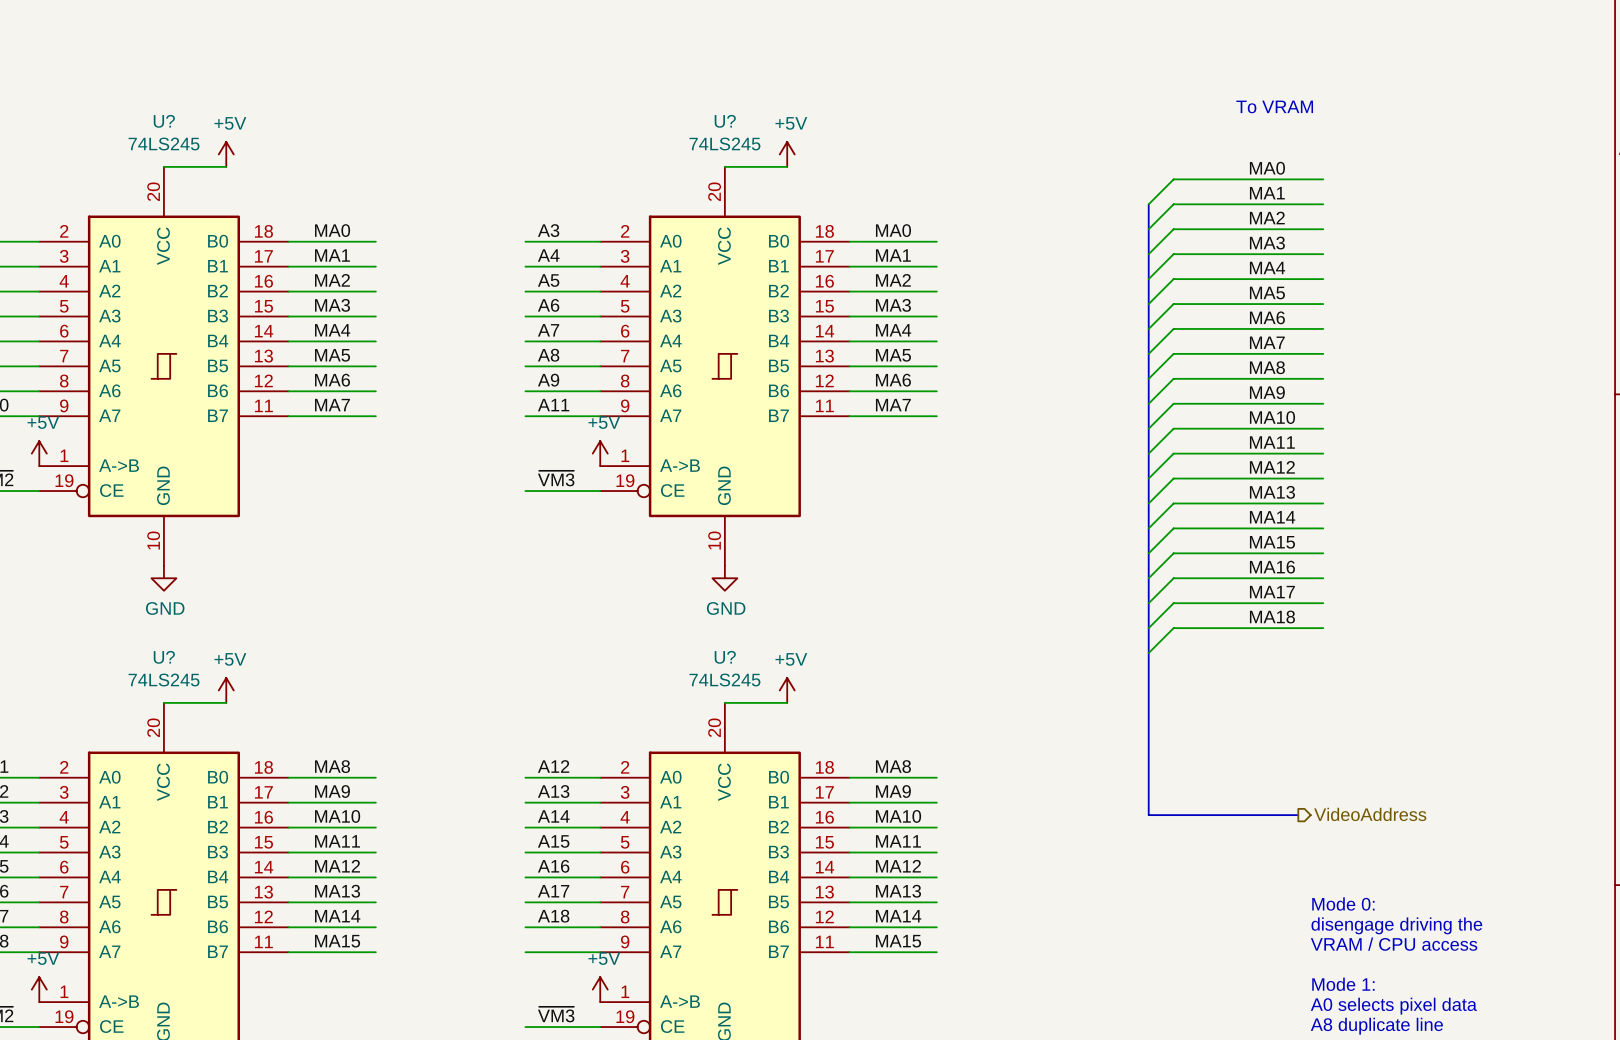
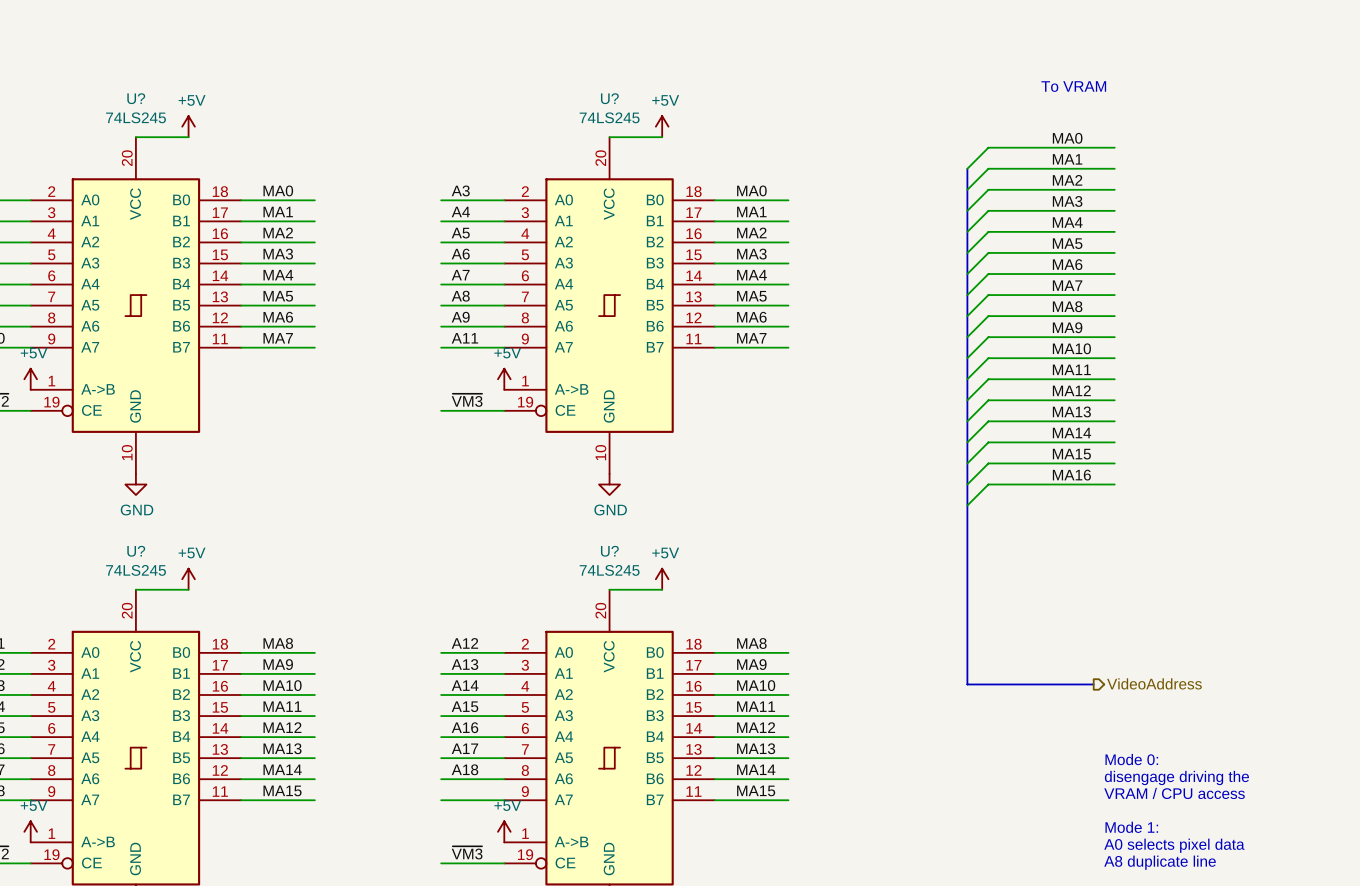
label: MA17 (1272, 592) -> none
wire: (1323, 603) (1173, 603) (1148, 628) -> none
label: MA18 (1272, 617) -> none
wire: (1323, 628) (1173, 628) (1148, 653) -> none

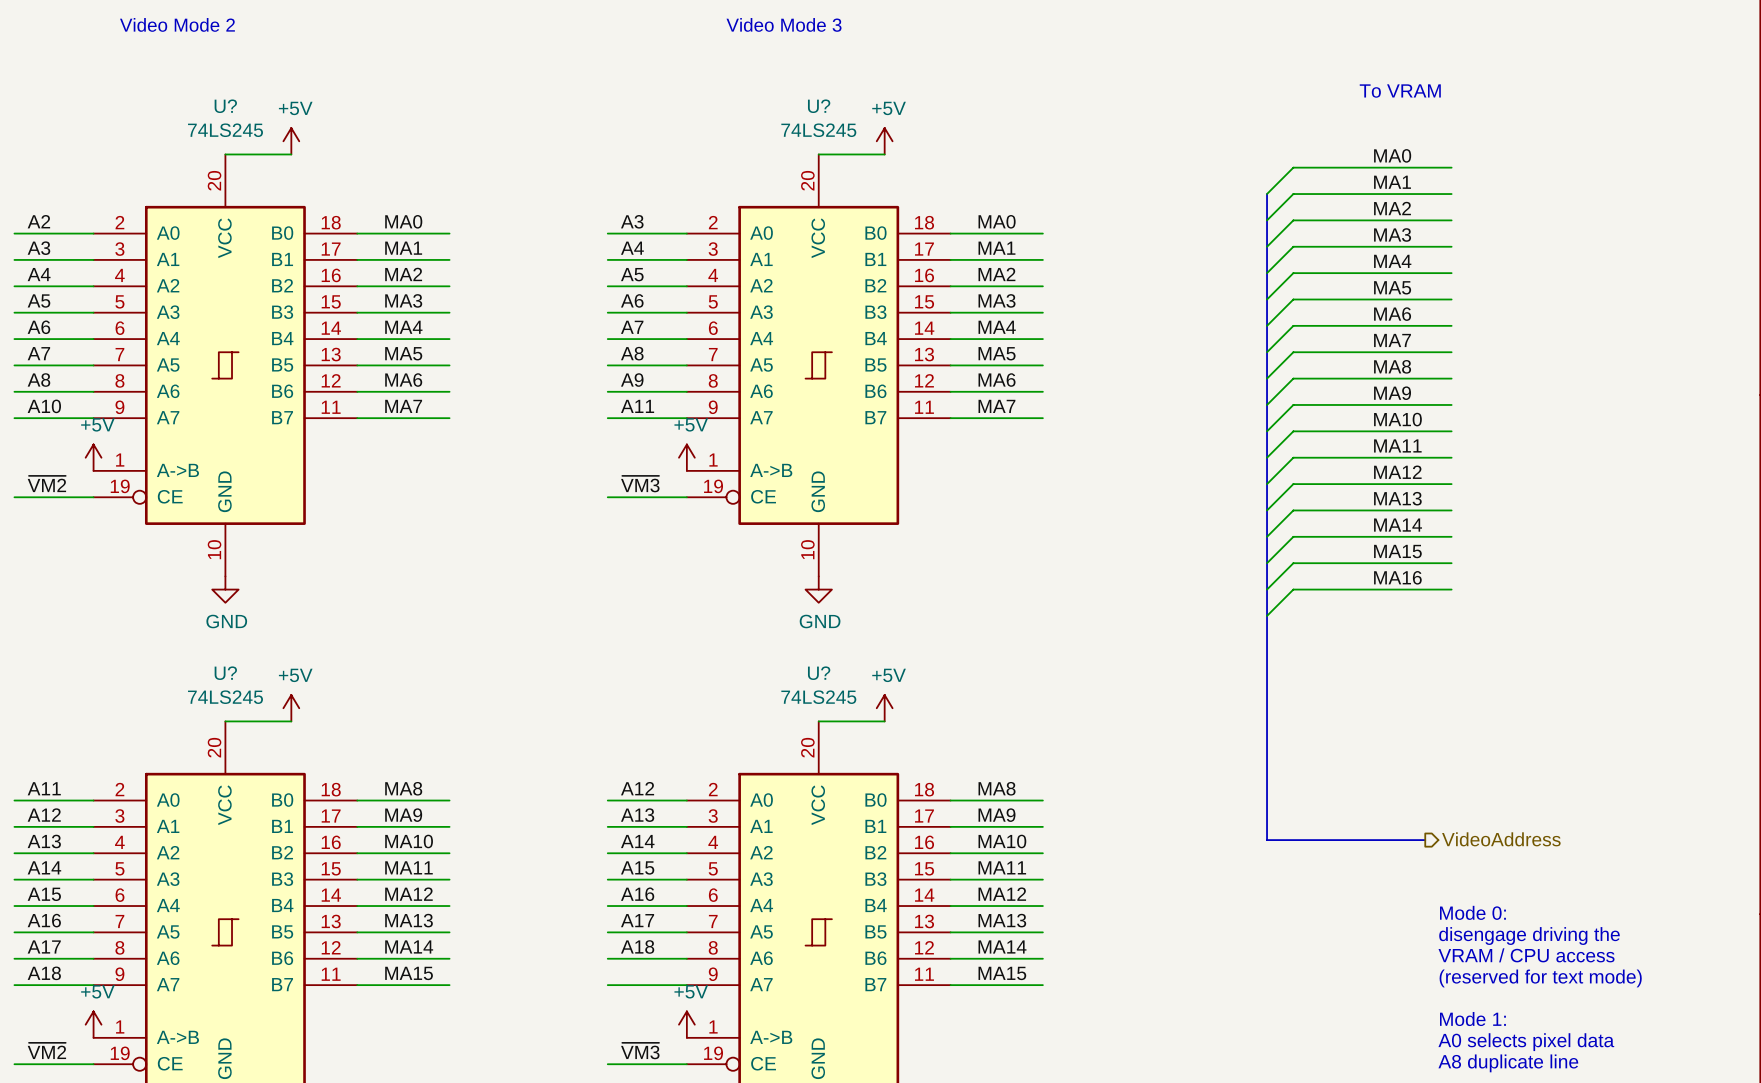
text: none -> Video Mode 2 (177, 24)
text: none -> Video Mode 3 (784, 24)
text: none -> Mode 0: (1472, 912)
text: Mode 0: (1131, 759) -> disengage driving the (1529, 936)
text: disengage driving the (1176, 777) -> VRAM / CPU access (1526, 955)
text: VRAM / CPU access (1174, 793) -> (reserved for text mode) (1540, 978)

